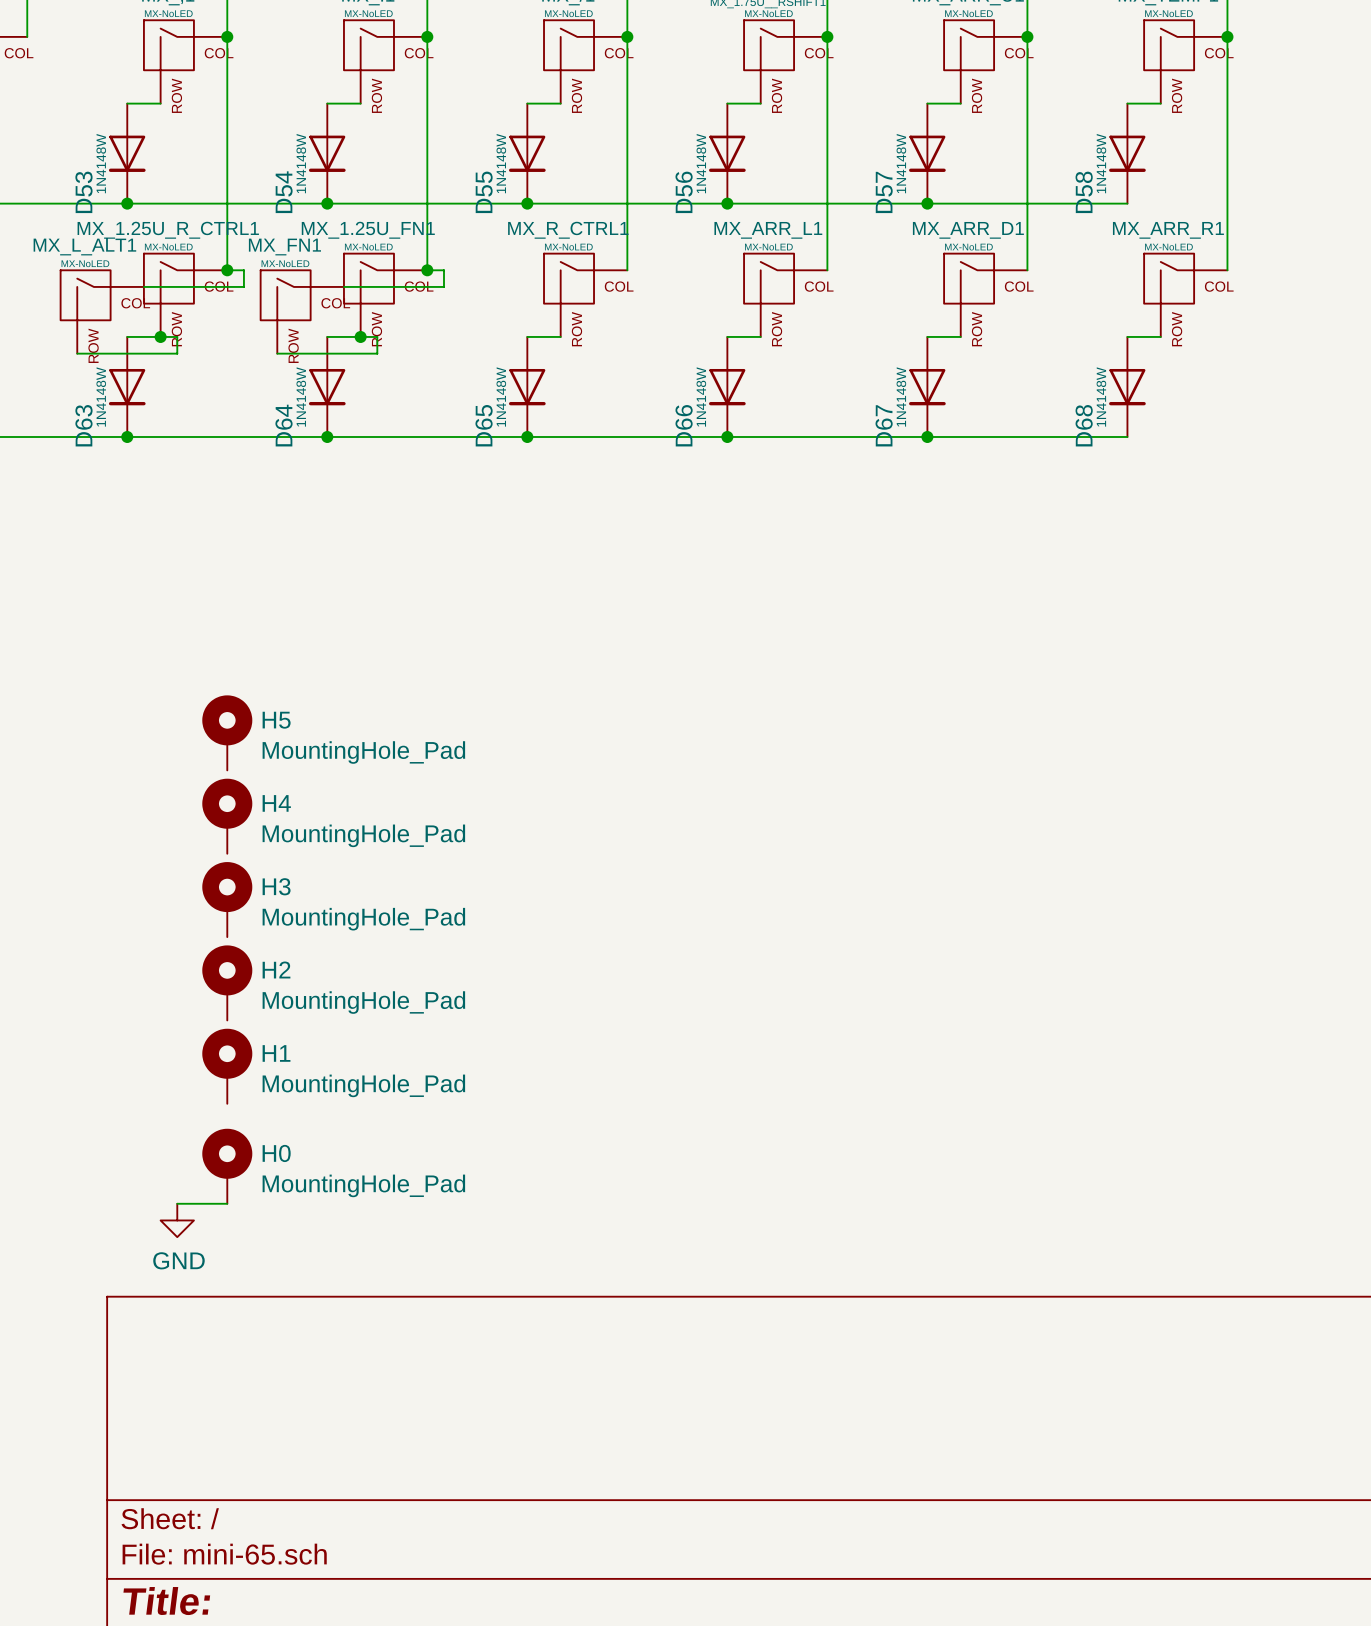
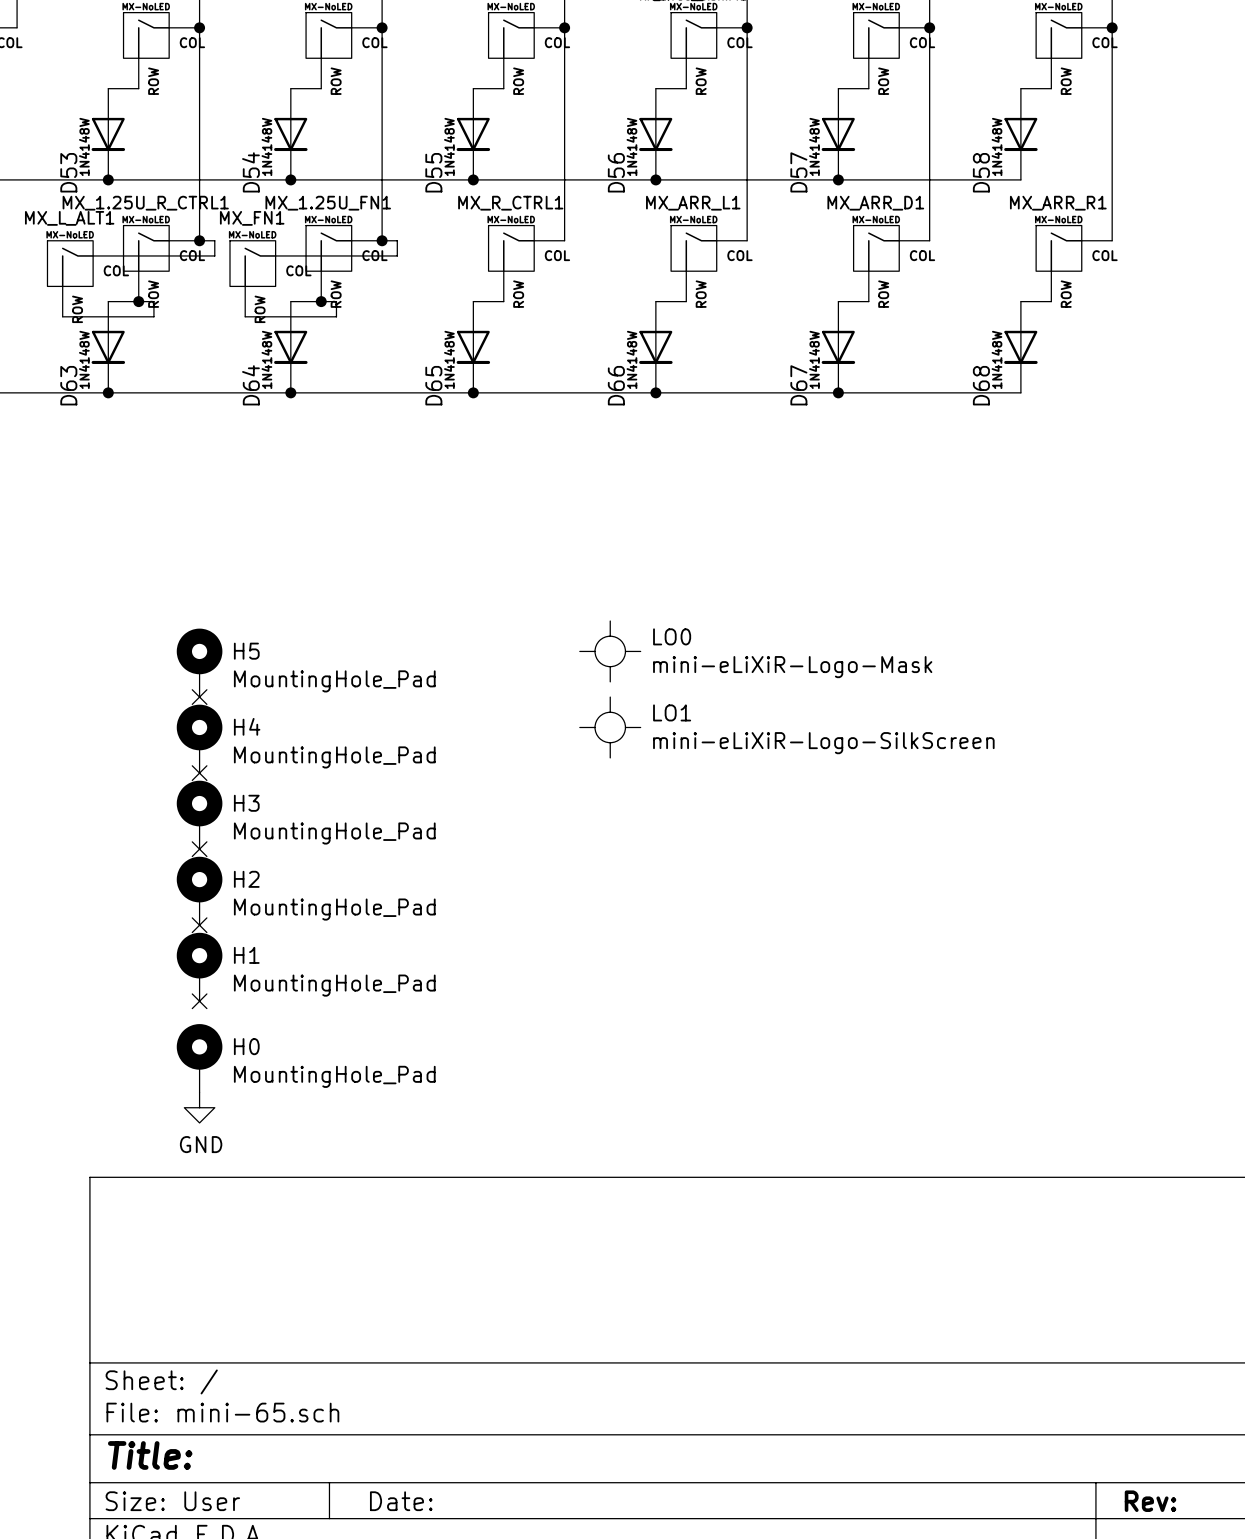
LO0: none -> mini-eLiXiR-Logo-Mask (610, 651)
no-connect mark: none -> (199, 697)
LO1: none -> mini-eLiXiR-Logo-SilkScreen (610, 727)
no-connect mark: none -> (199, 773)
no-connect mark: none -> (199, 849)
no-connect mark: none -> (199, 925)
no-connect mark: none -> (199, 1001)
wire: (177, 1203) (227, 1203) -> none
power symbol position: GND (177, 1220) -> GND (199, 1107)

